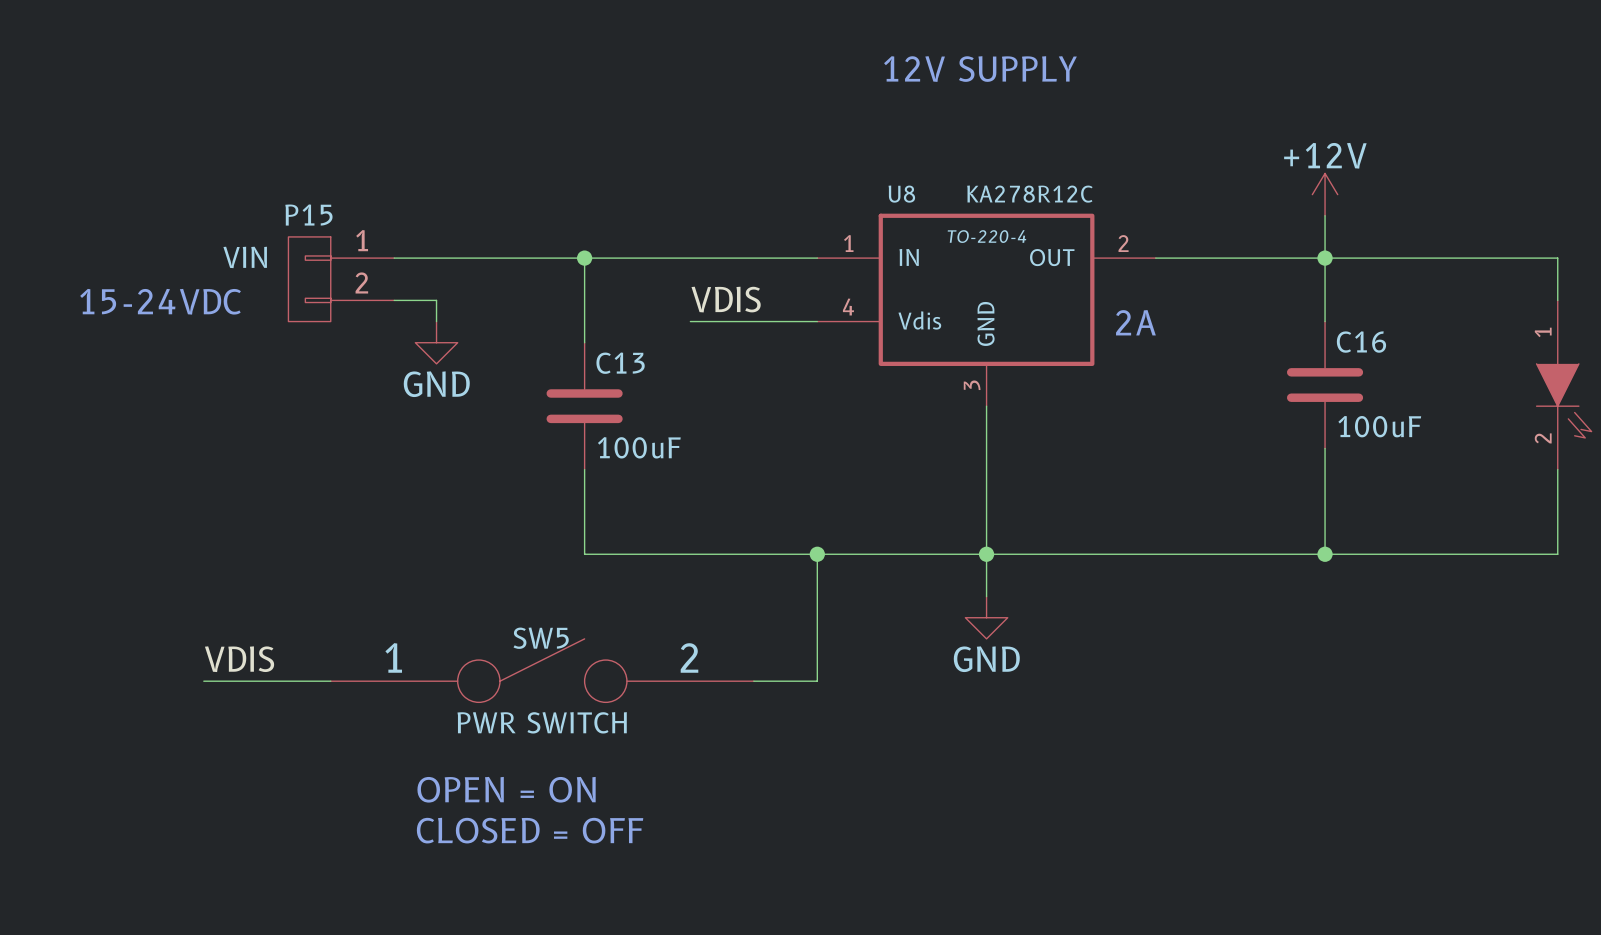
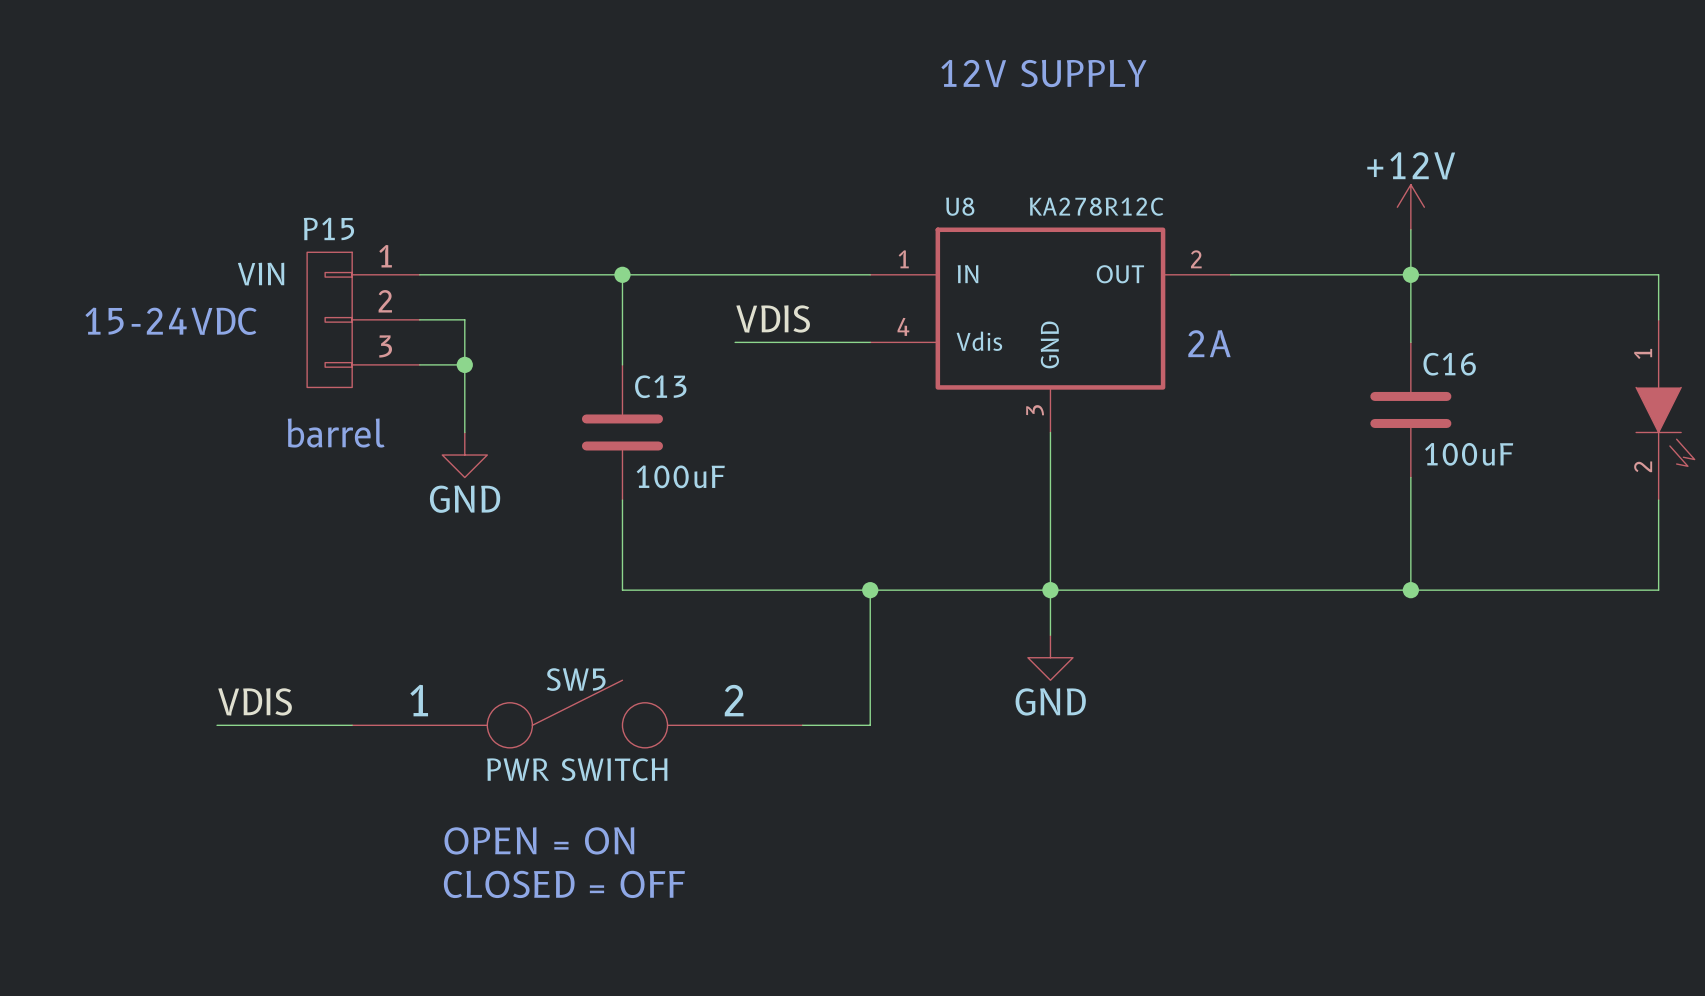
P15 symbol: [288, 236, 395, 322] -> [307, 252, 420, 388]
U8 text: TO-220-4 (986, 236) -> none
wire: none -> (464, 342) (464, 432)
wire: none -> (419, 364) (464, 364)
power symbol position: GND (436, 342) -> GND (464, 455)
junction: none -> (464, 364)
text: none -> barrel (336, 433)

